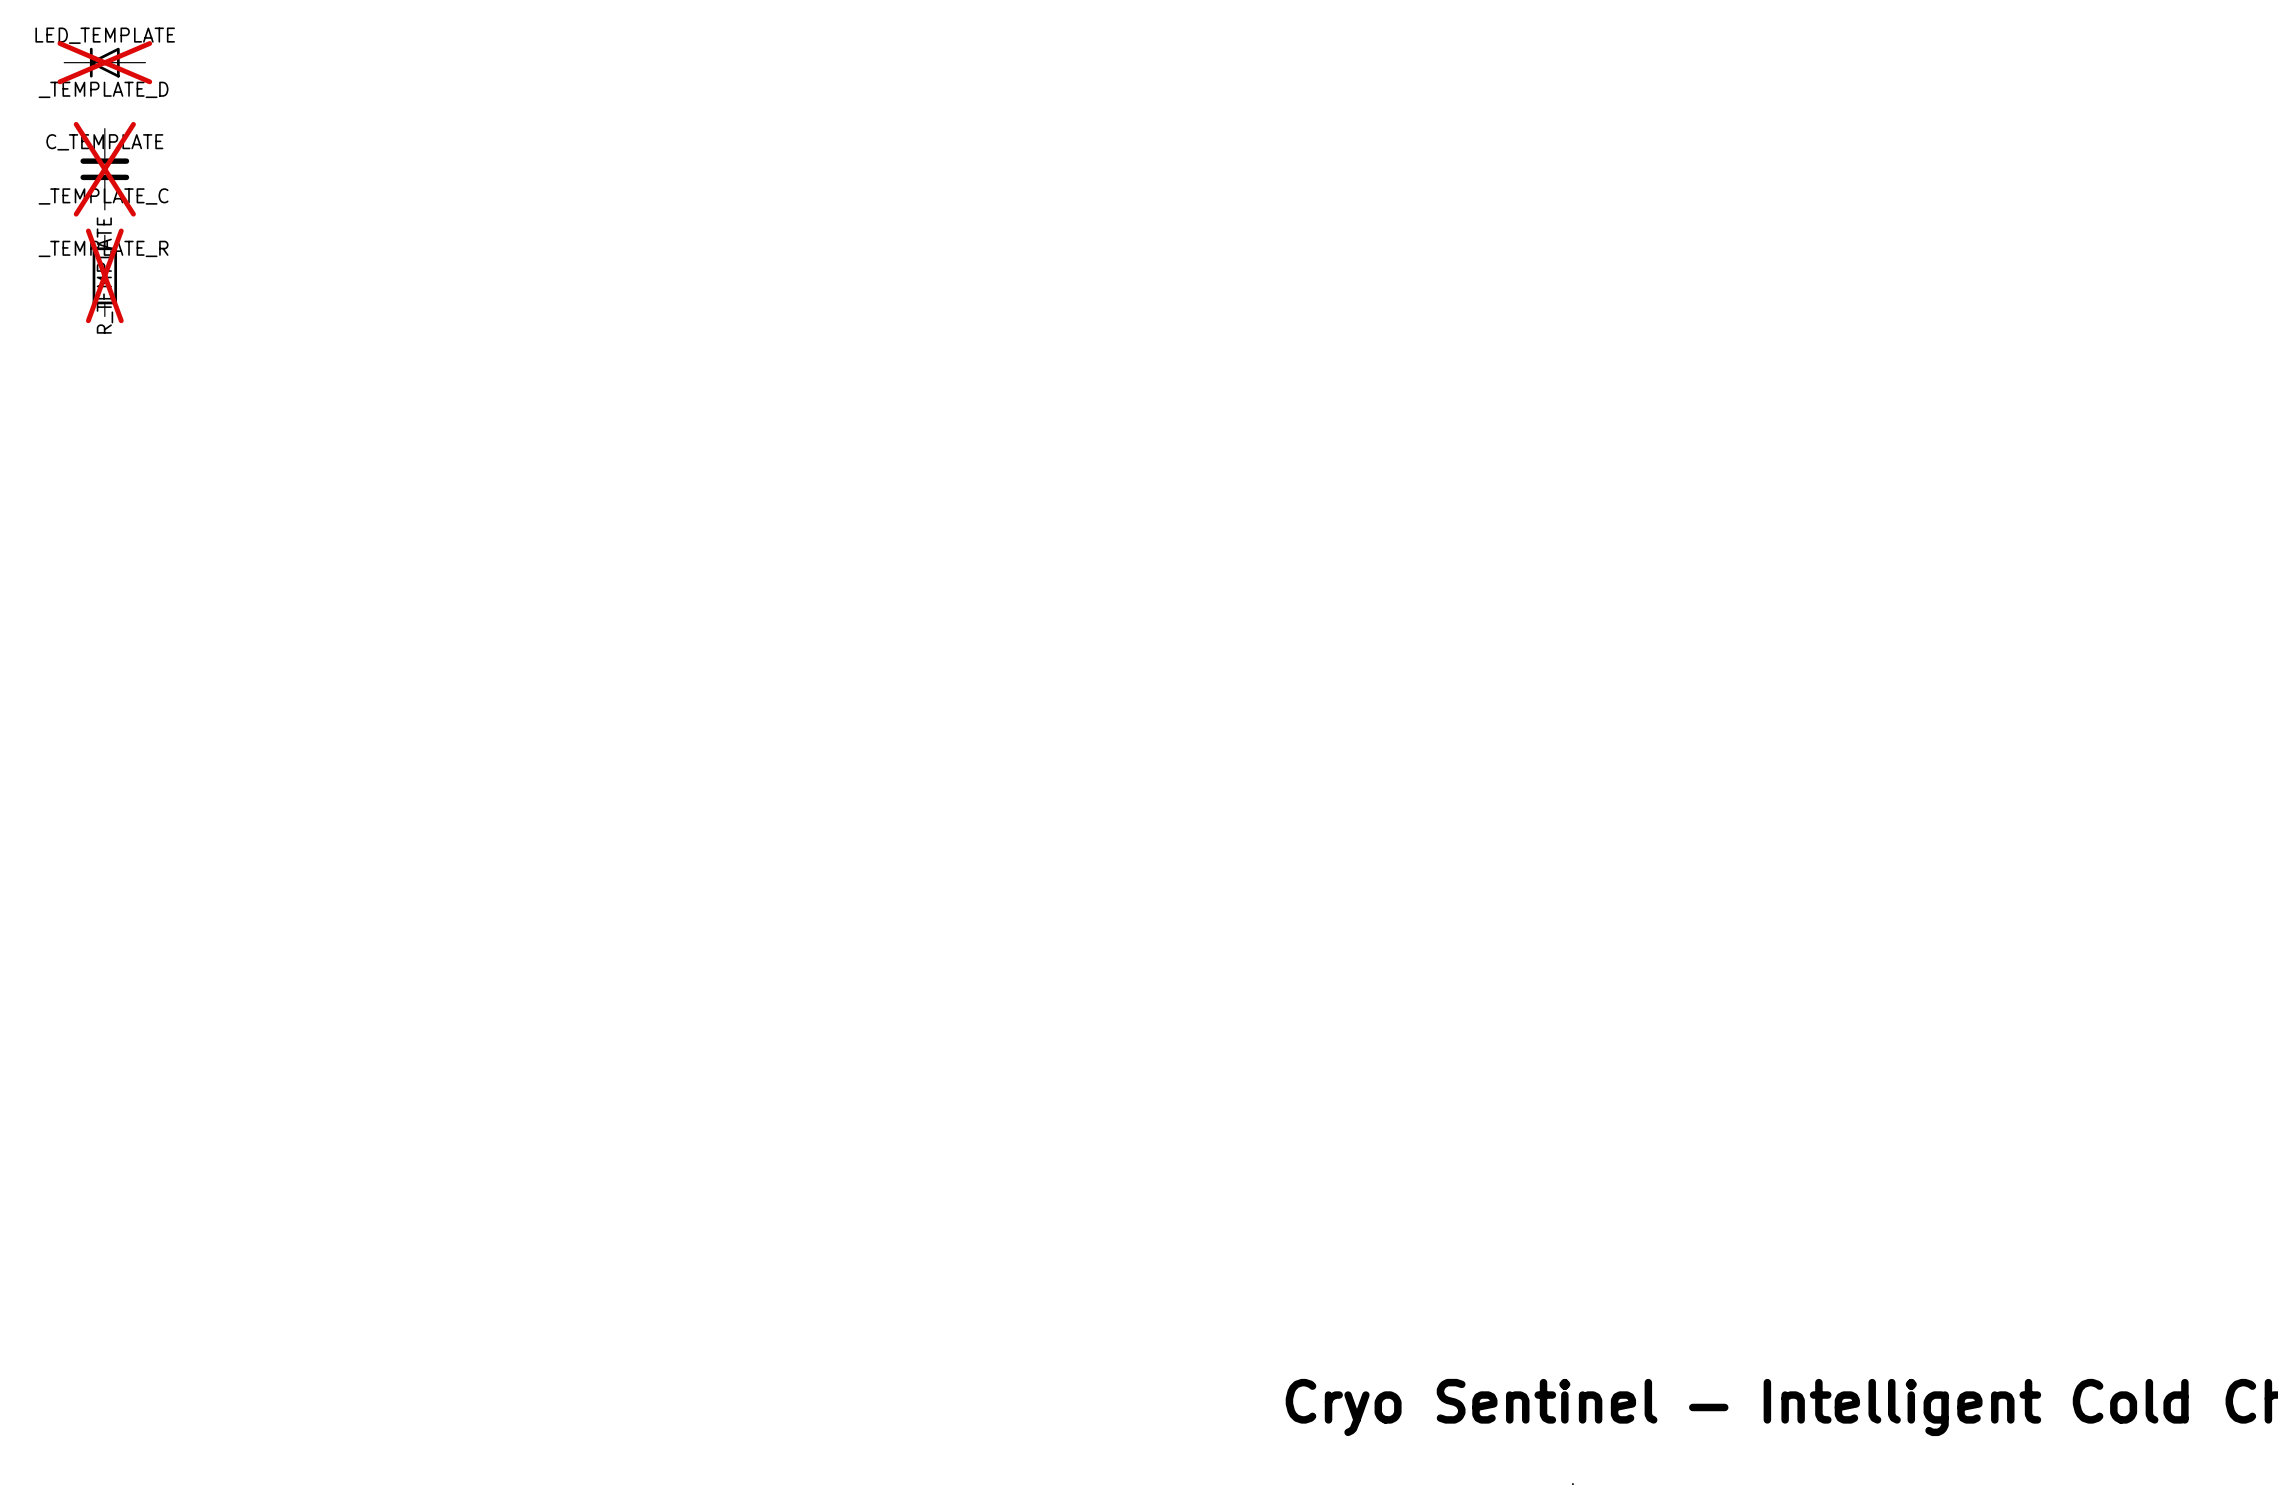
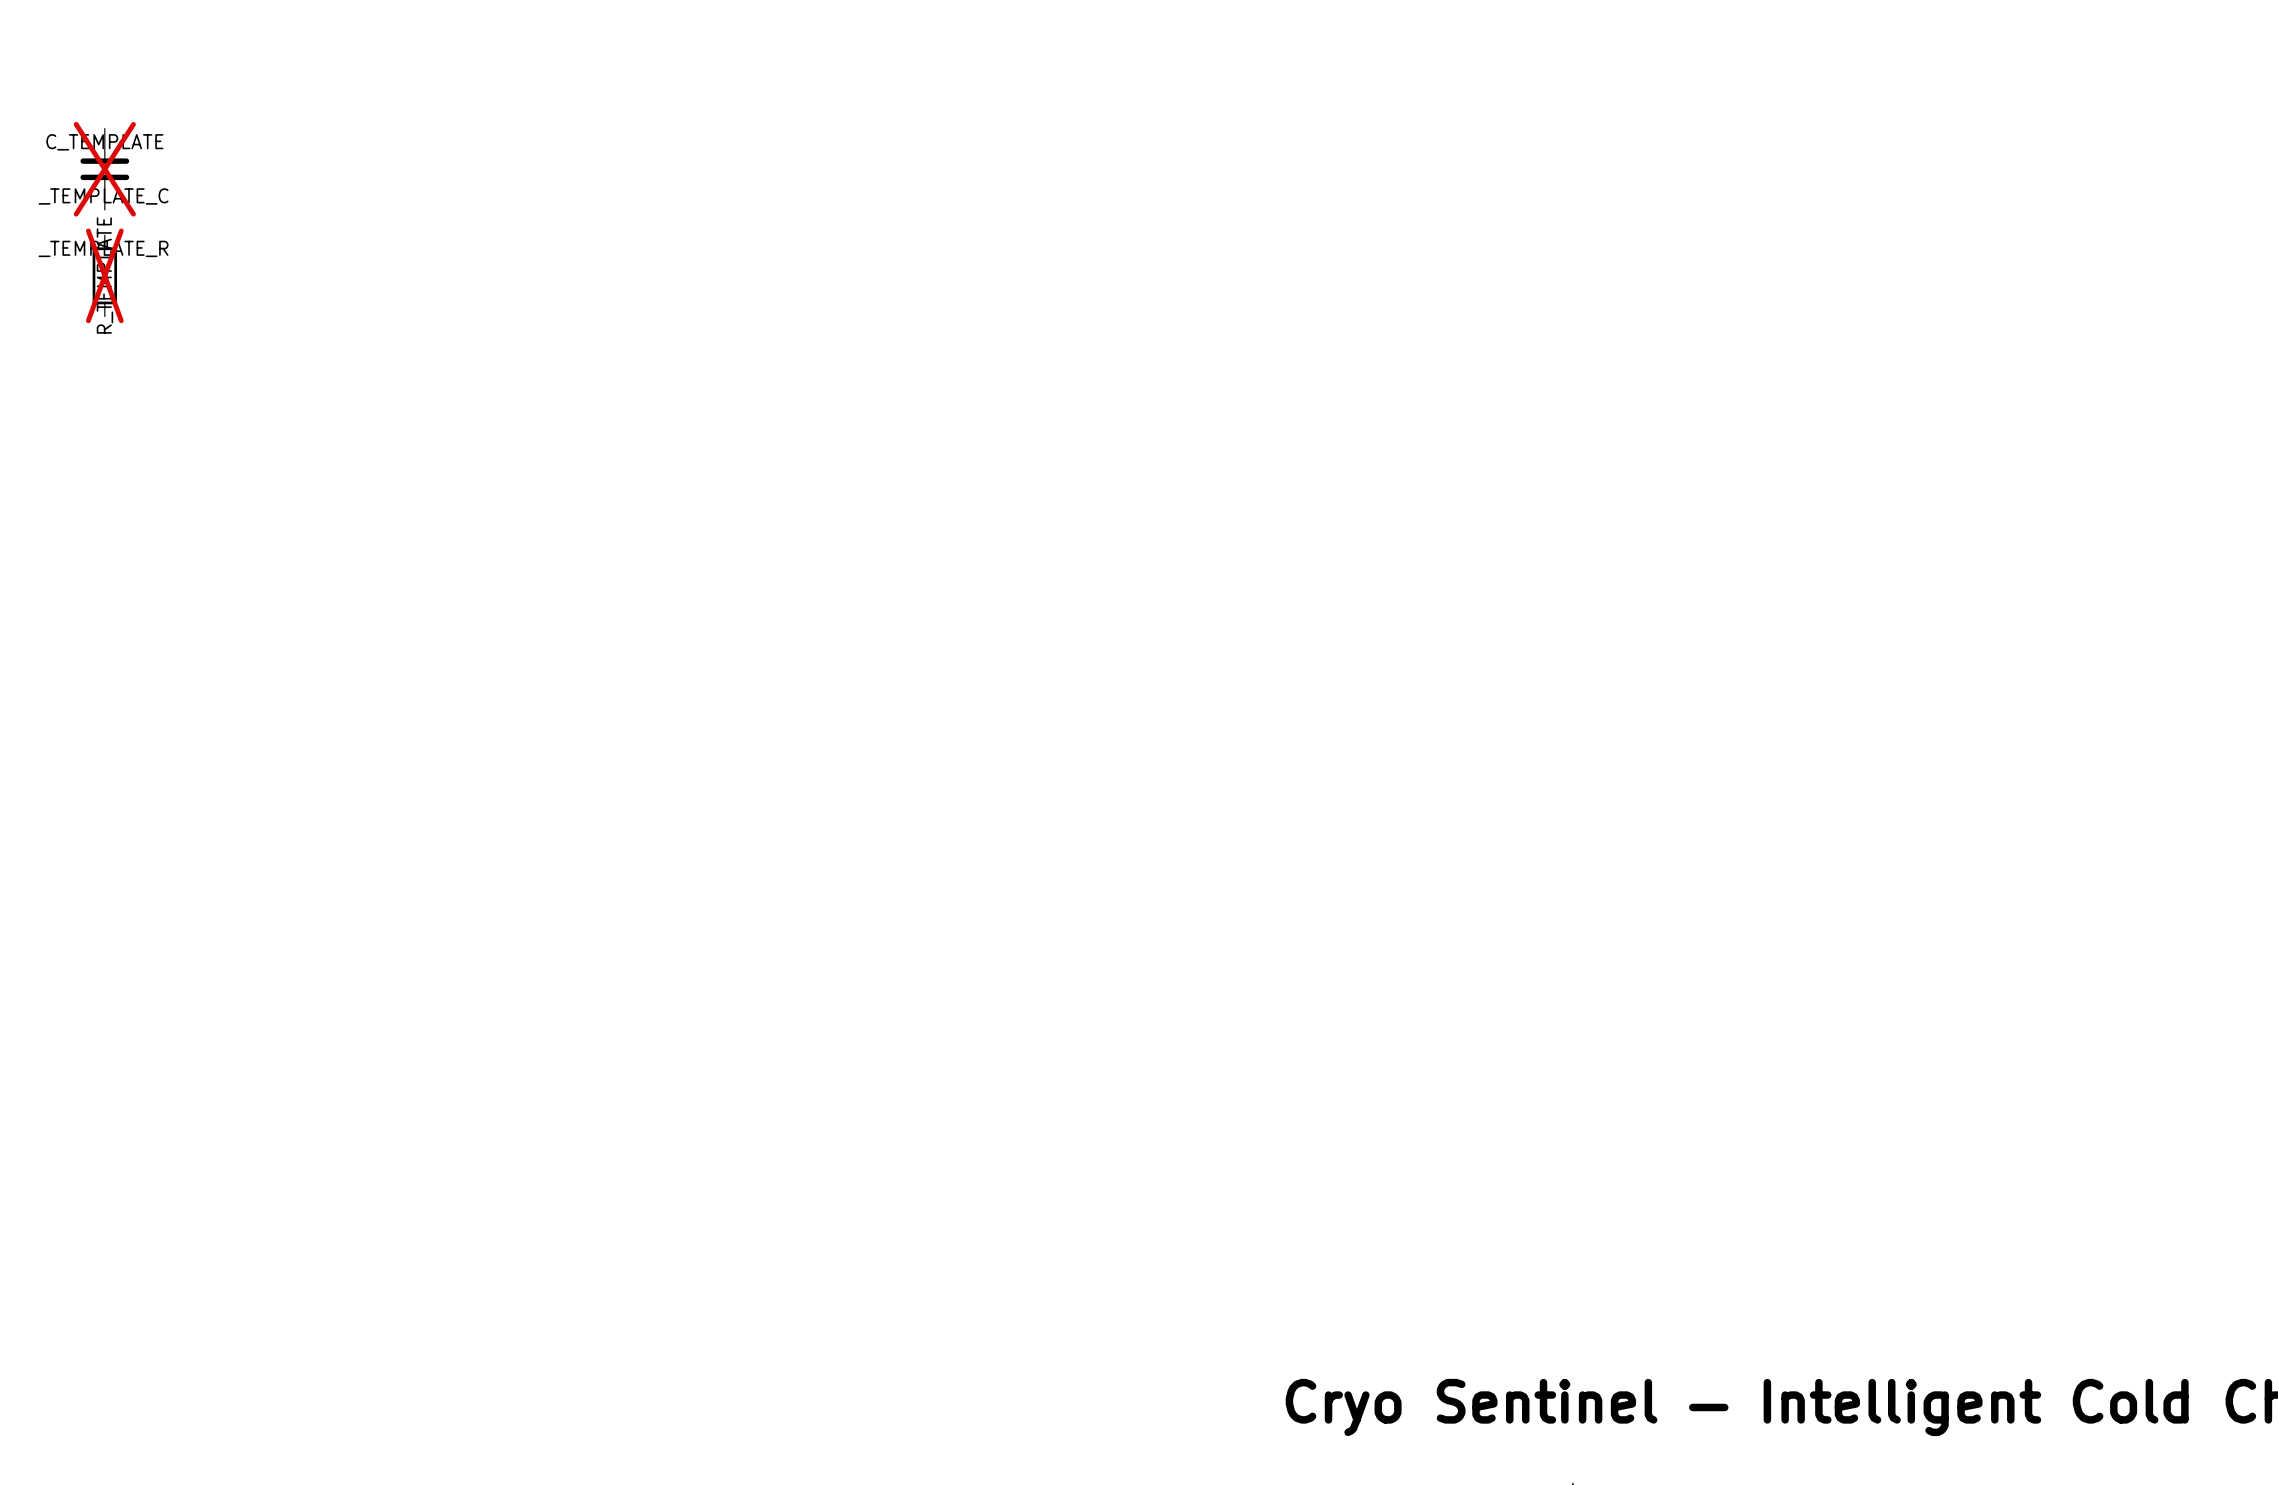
_TEMPLATE_D: LED_TEMPLATE (104, 62) -> none

